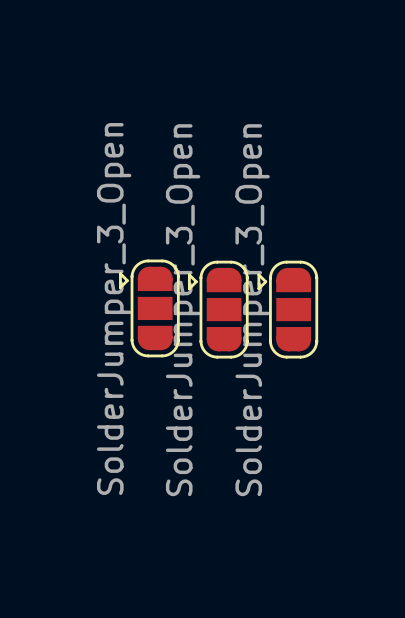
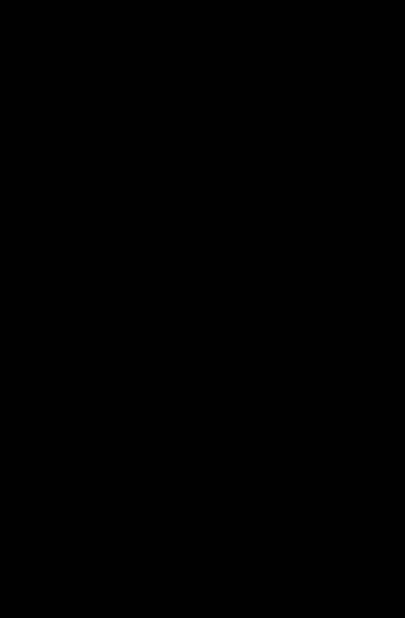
part: SolderJumper_3_Open (149, 308) -> none
part: SolderJumper_3_Open (218, 309) -> none
part: SolderJumper_3_Open (287, 309) -> none

